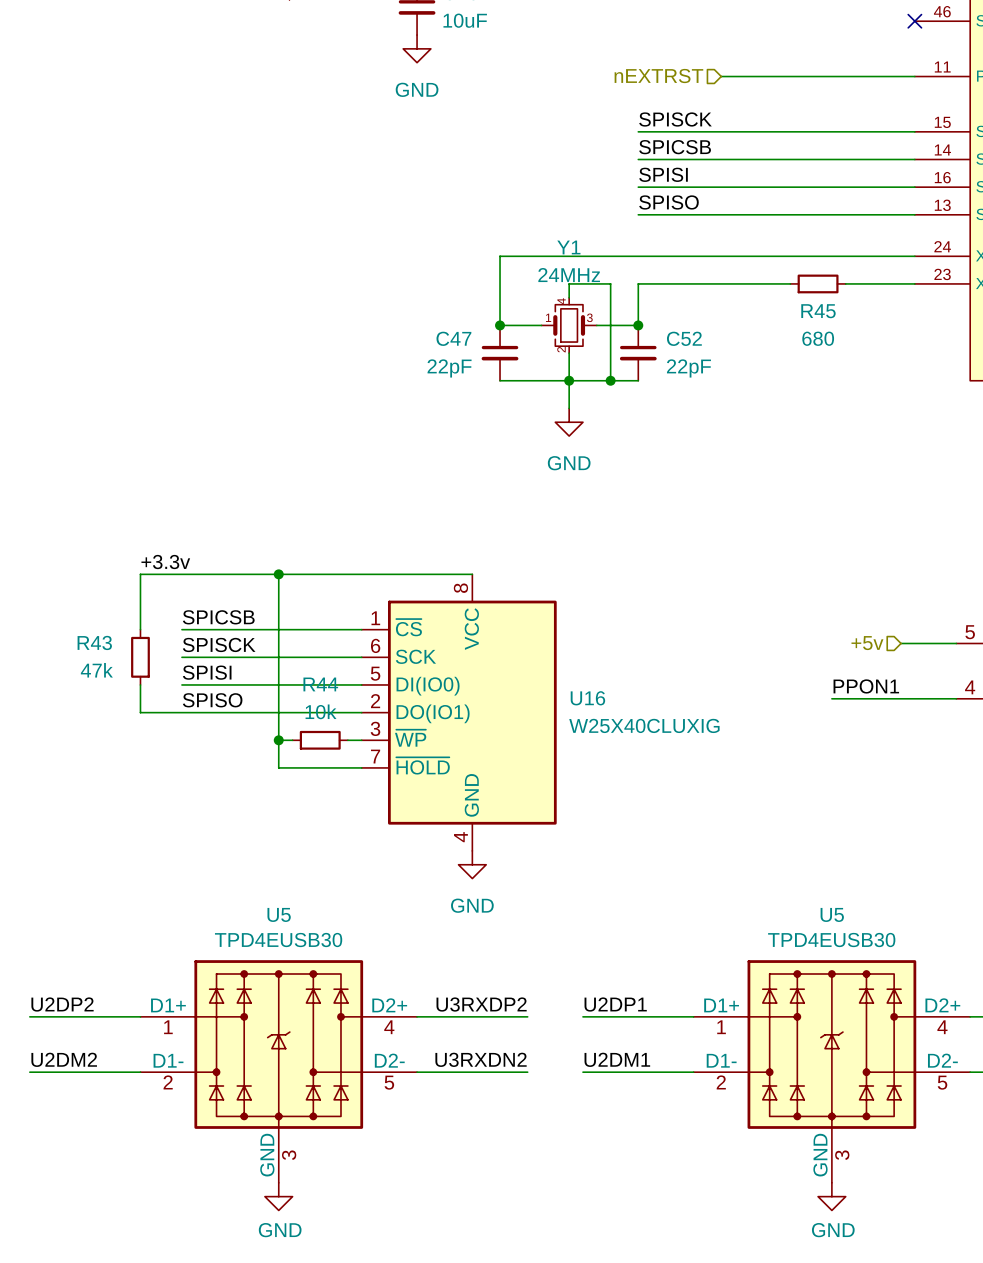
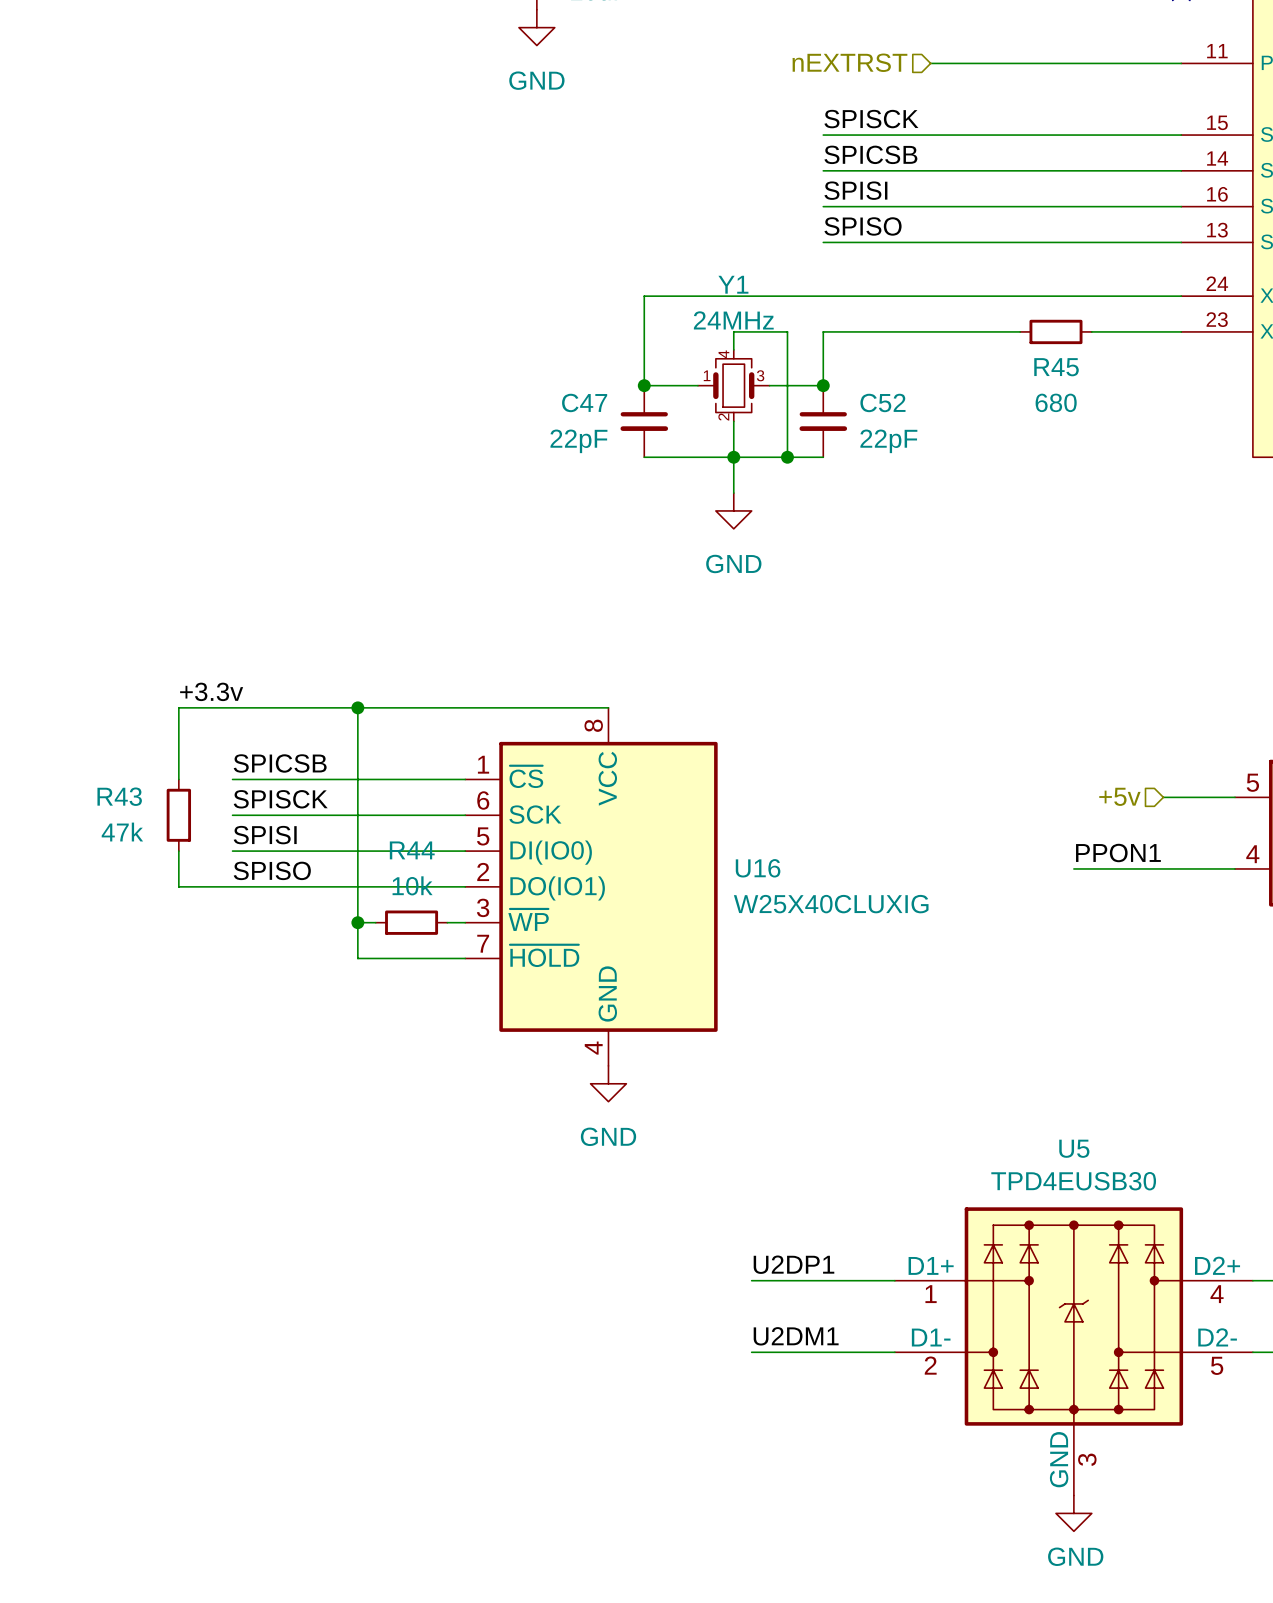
label: U2DP2 (62, 1004) -> none
label: U3RXDP2 (481, 1004) -> none
wire: (29, 1016) (140, 1016) -> none
wire: (417, 1016) (527, 1016) -> none
label: U2DM2 (64, 1059) -> none
label: U3RXDN2 (481, 1059) -> none
U5: TPD4EUSB30 (278, 1071) -> none
wire: (29, 1072) (140, 1072) -> none
wire: (417, 1072) (527, 1072) -> none
power symbol: GND (278, 1196) -> none

